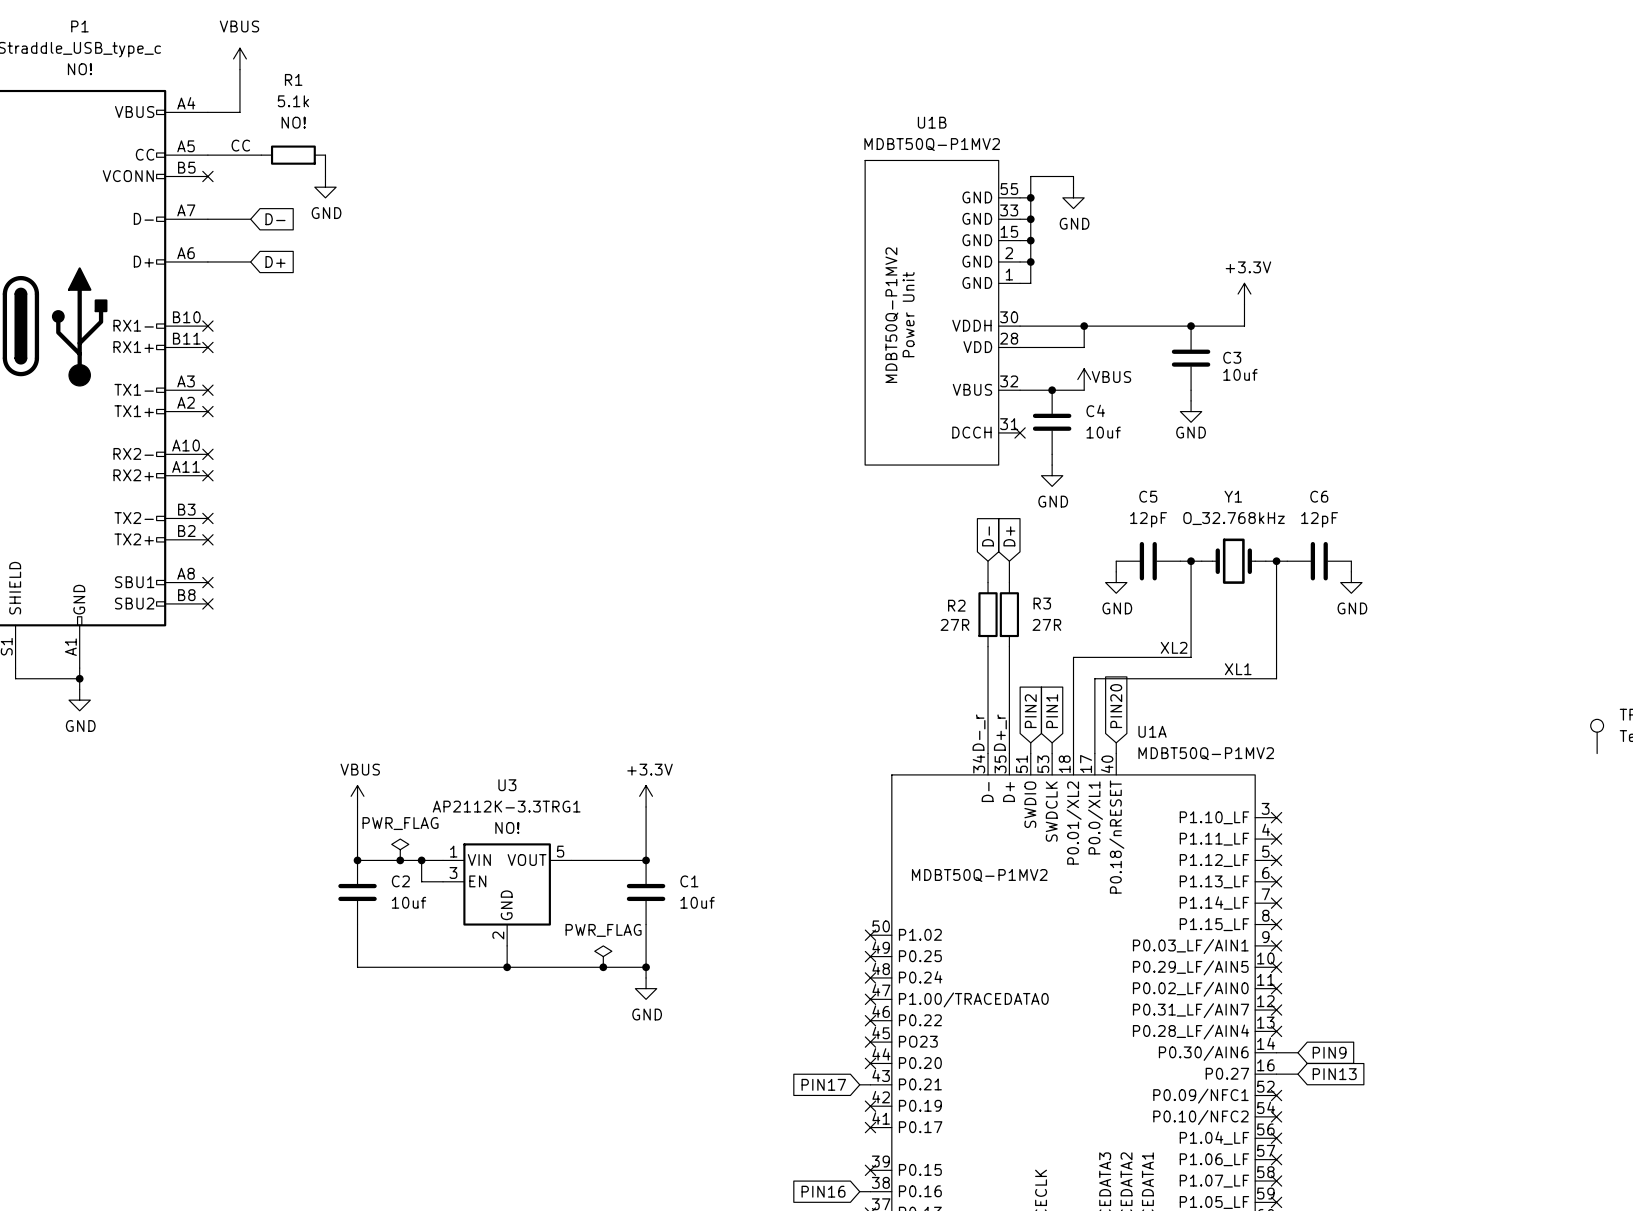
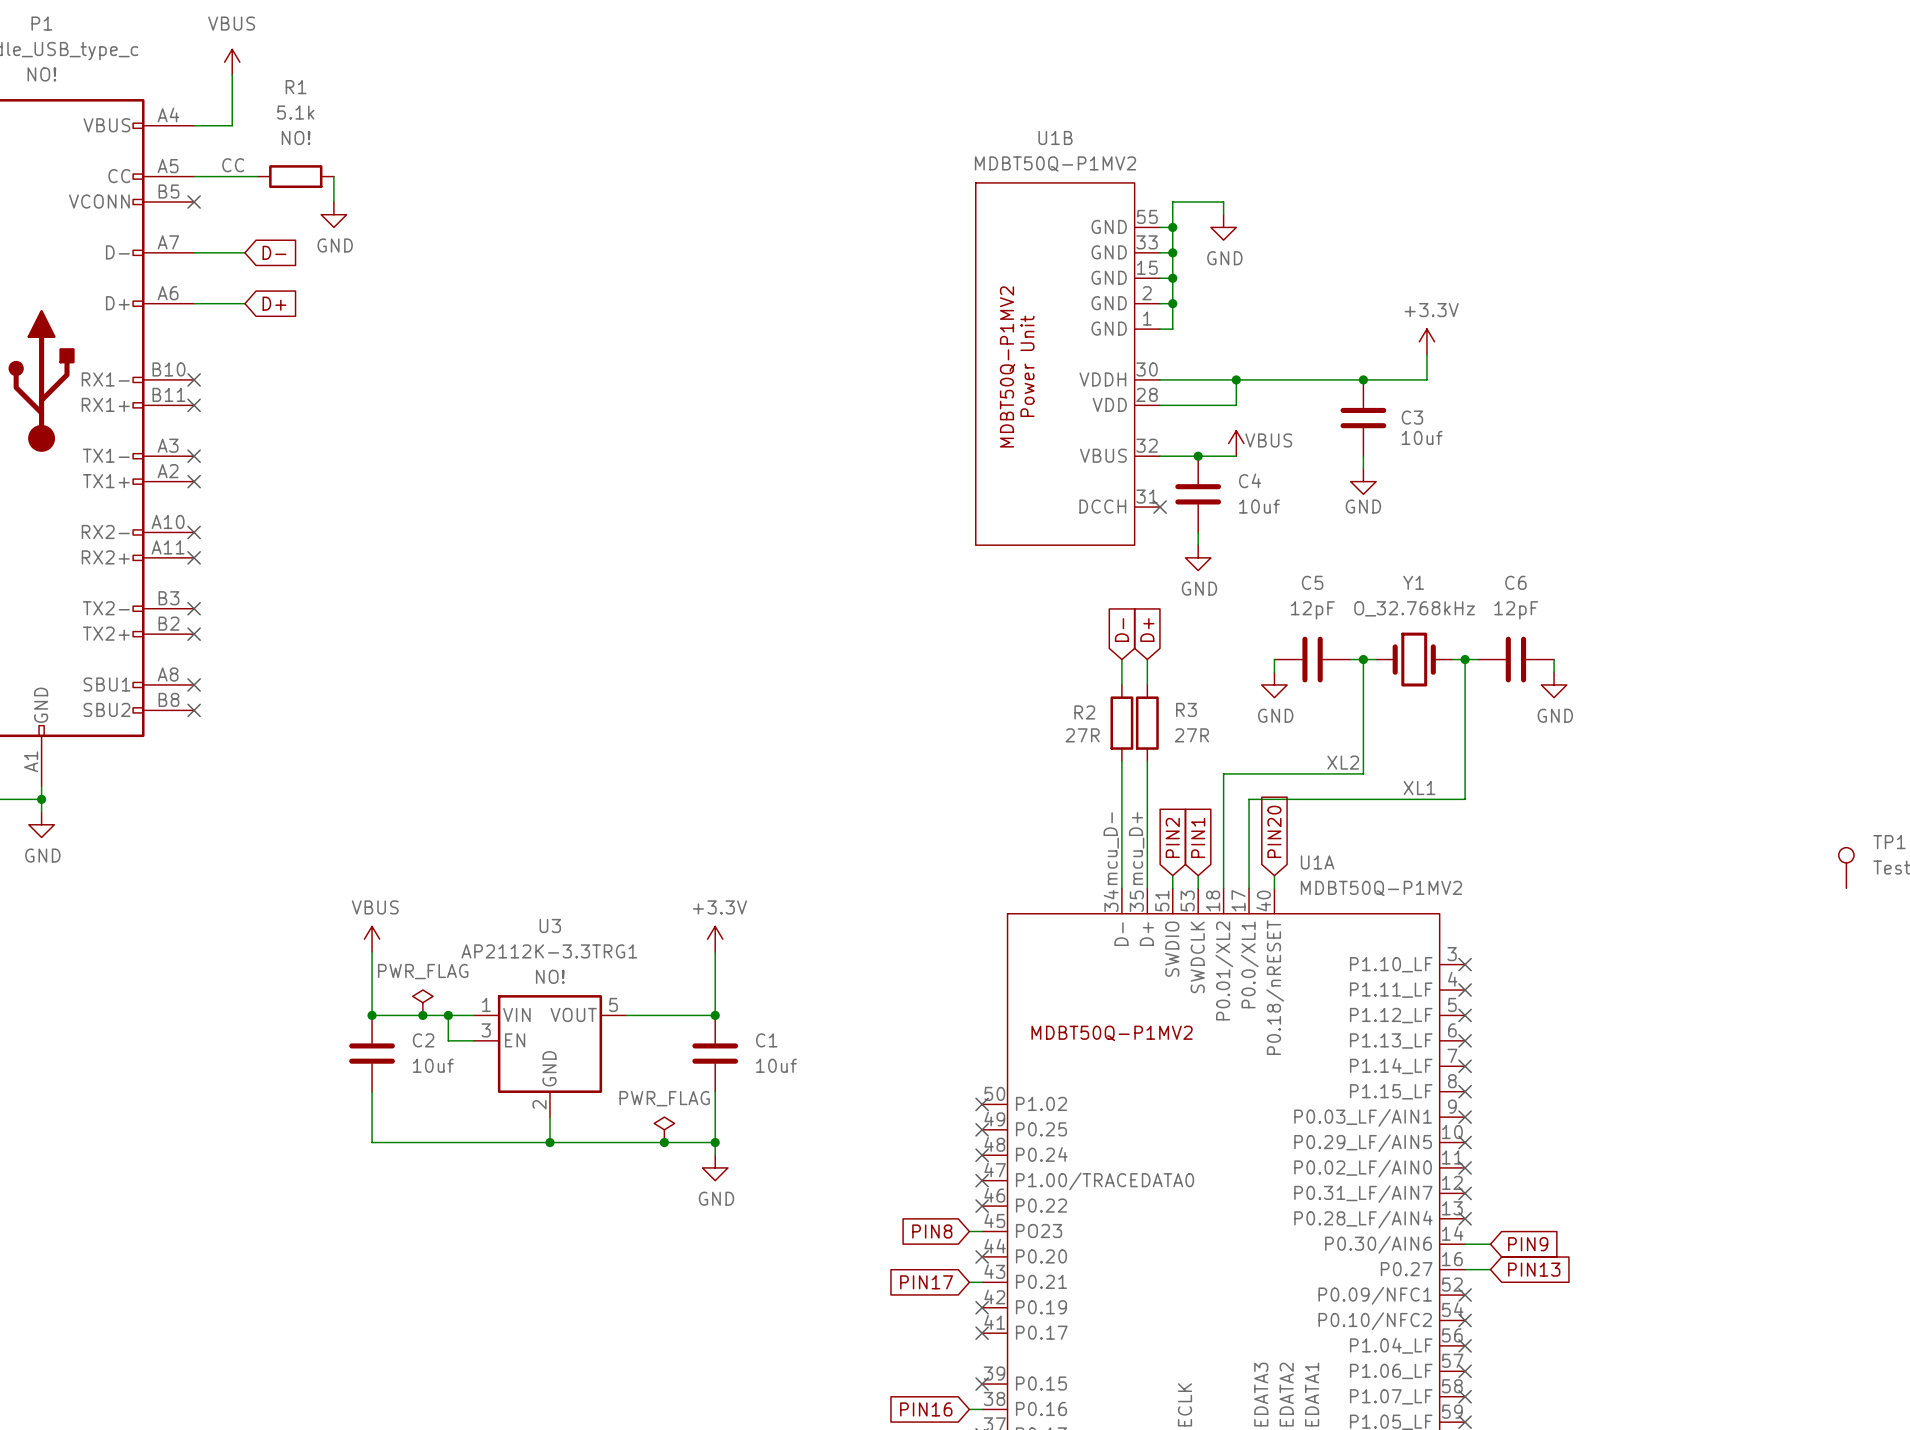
label: D-_r (978, 732) -> mcu_D- (1111, 848)
label: D+_r (1000, 732) -> mcu_D+ (1136, 848)
global label: none -> PIN8 (932, 1231)
wire: none -> (969, 1231) (982, 1231)
no-connect mark: (870, 1042) -> none

